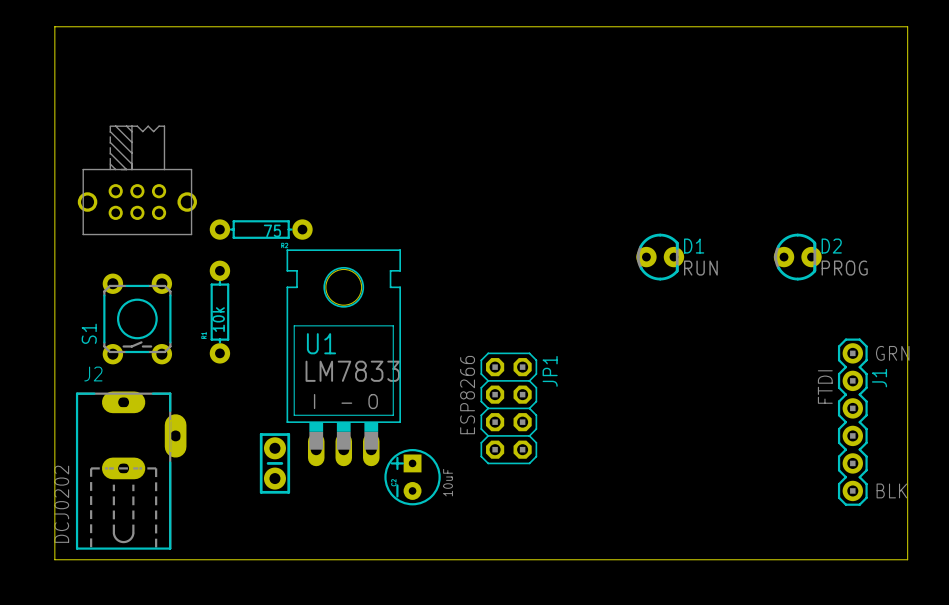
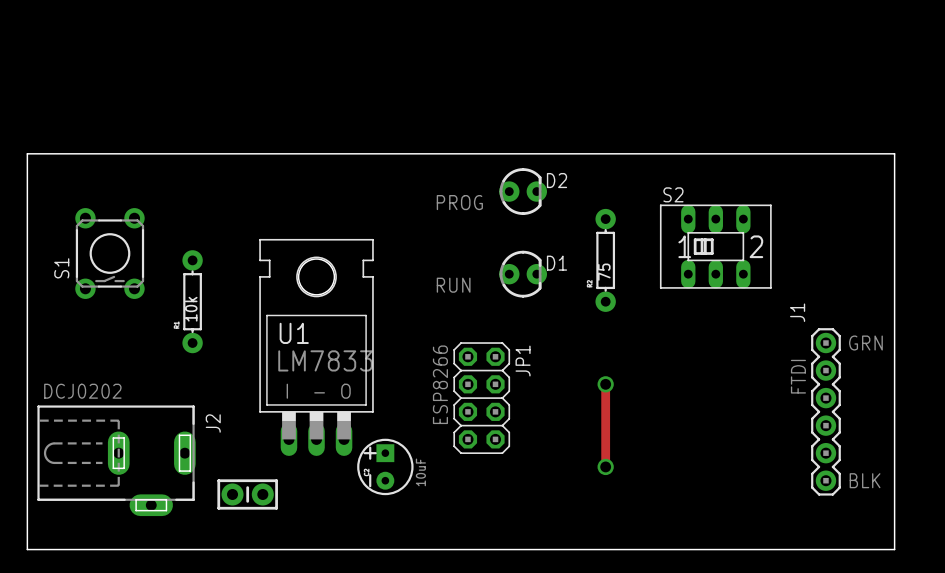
board edge: (54, 164) (54, 26) (907, 26) (907, 559) -> (27, 153) (894, 153) (894, 549) (880, 549)
part: (137, 180) -> none
part rotation: 0° (261, 229) -> 90° clockwise (605, 260)
part position: (261, 229) -> (605, 260)
D1 position: (660, 257) -> (523, 274)
S2: none -> (715, 246)
D2 position: (797, 257) -> (523, 191)
D1 value position: RUN (700, 268) -> RUN (453, 285)
D2 value position: PROG (844, 268) -> PROG (459, 202)
S1 position: (137, 318) -> (109, 253)
J1 name position: J1 (879, 378) -> J1 (797, 312)
track: none -> (605, 384) (605, 466)
via: none -> (605, 384)
part rotation: 0° (274, 463) -> 90° clockwise (247, 494)
part position: (274, 463) -> (247, 494)
J2 rotation: 0° (131, 470) -> 90° clockwise (116, 460)
via: none -> (605, 466)

